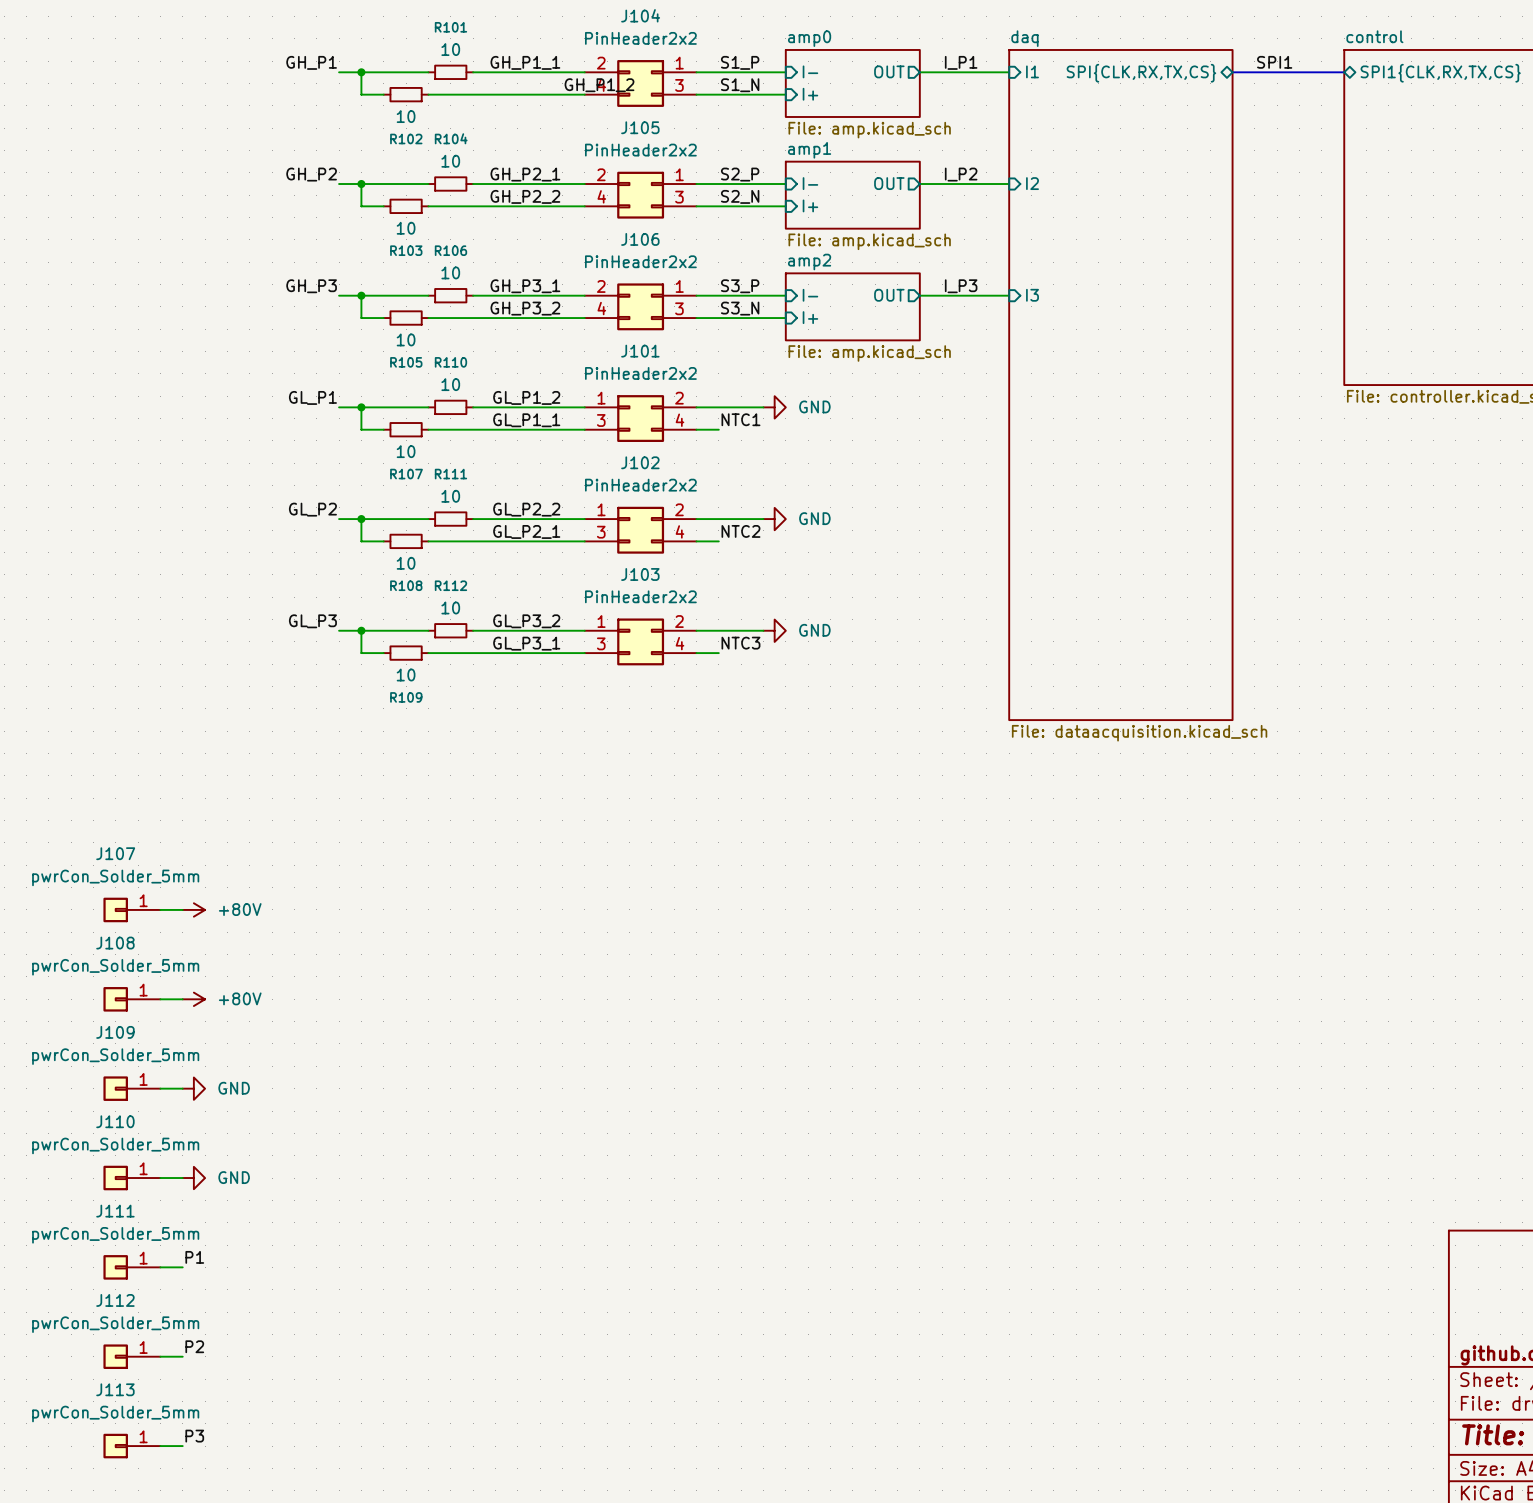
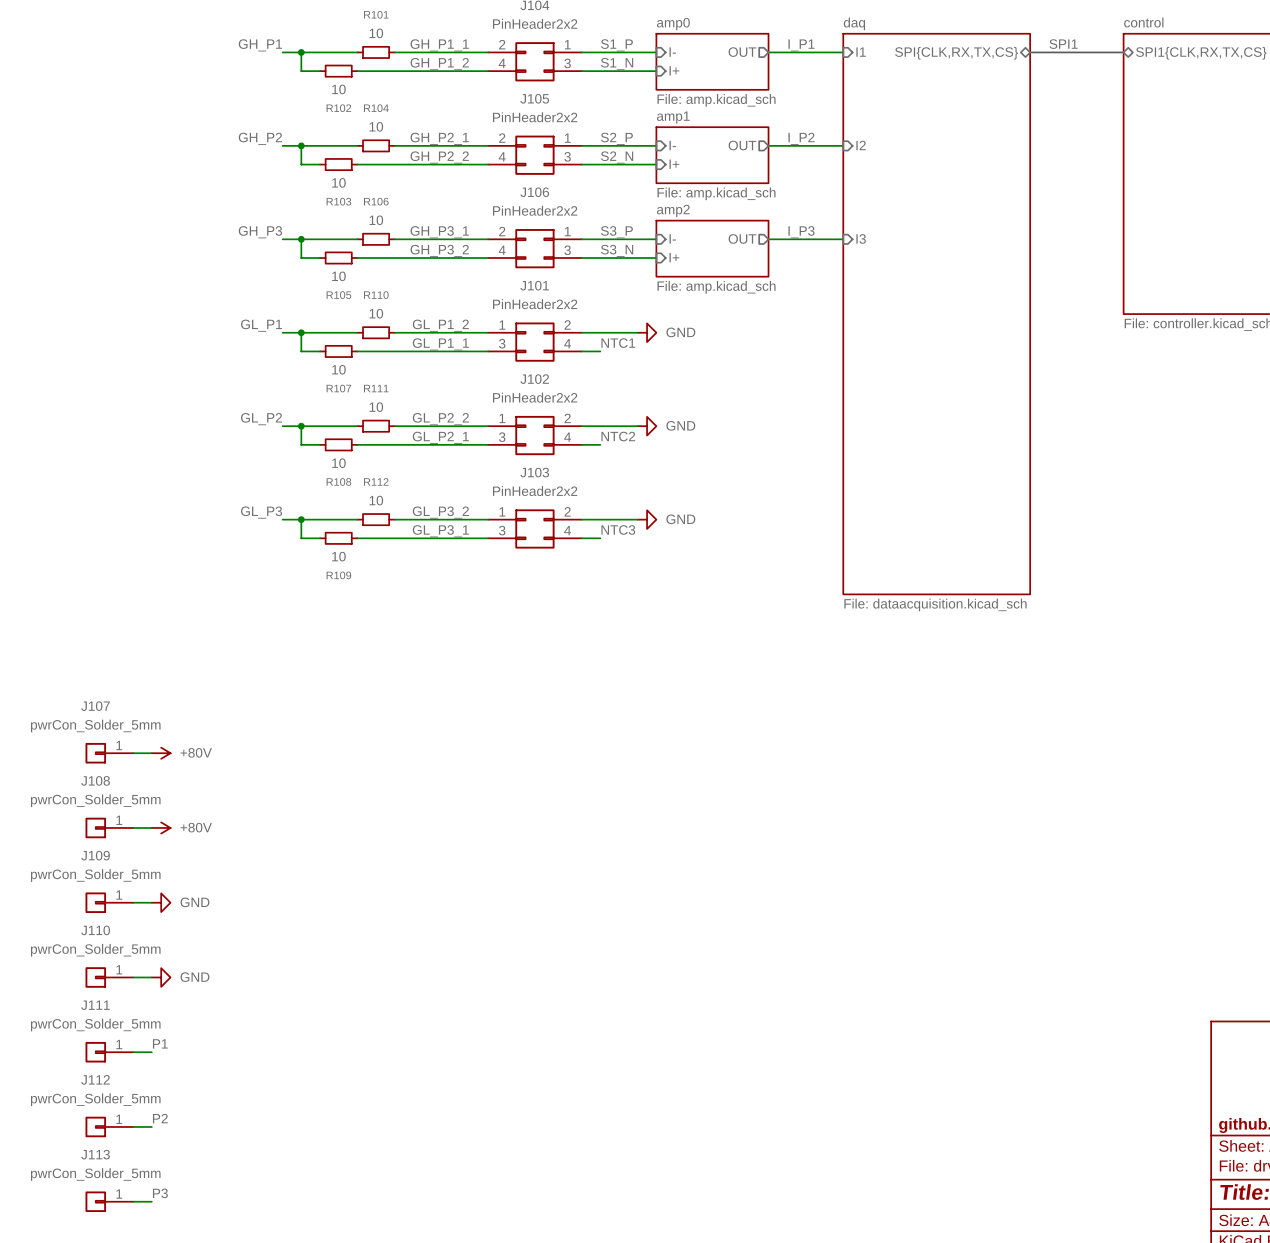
label position: GH_P1_2 (599, 85) -> GH_P1_2 (439, 64)

